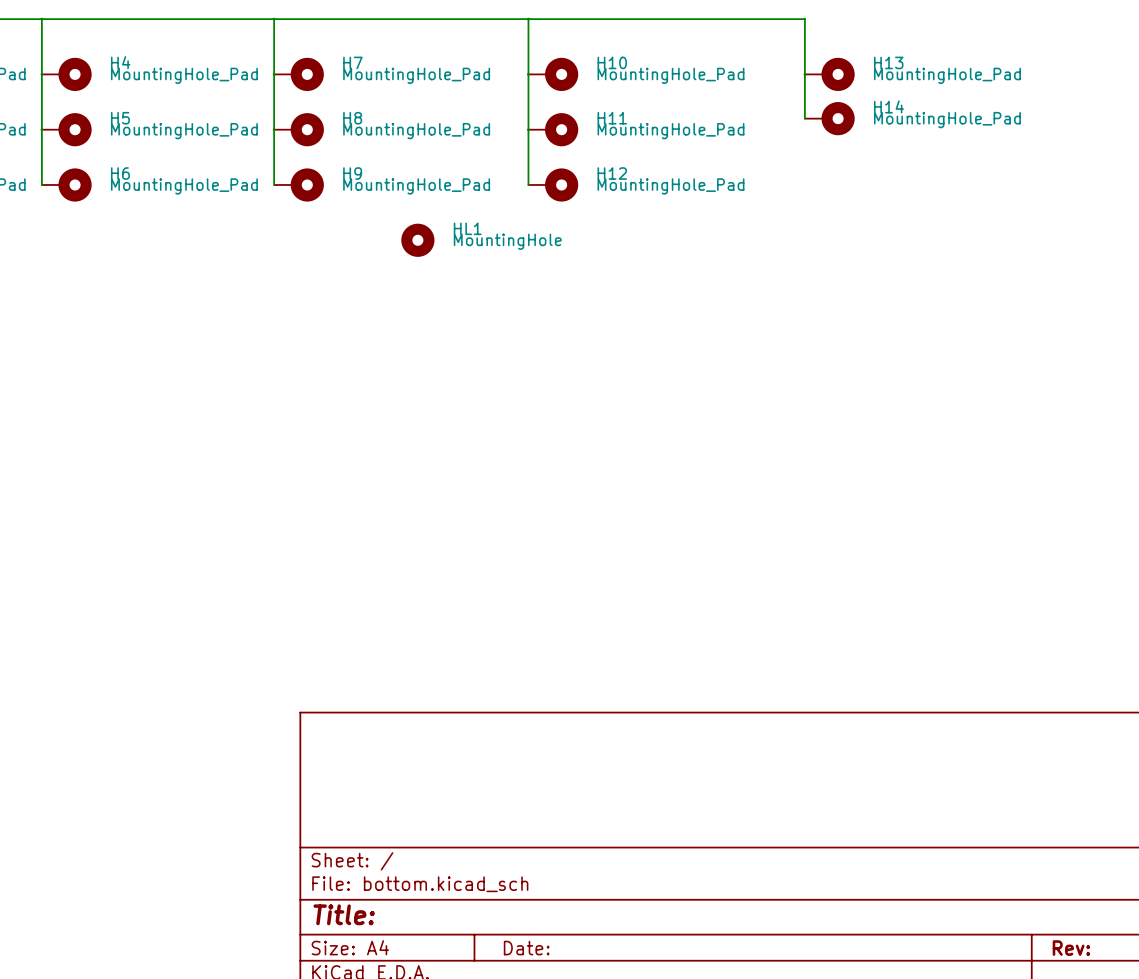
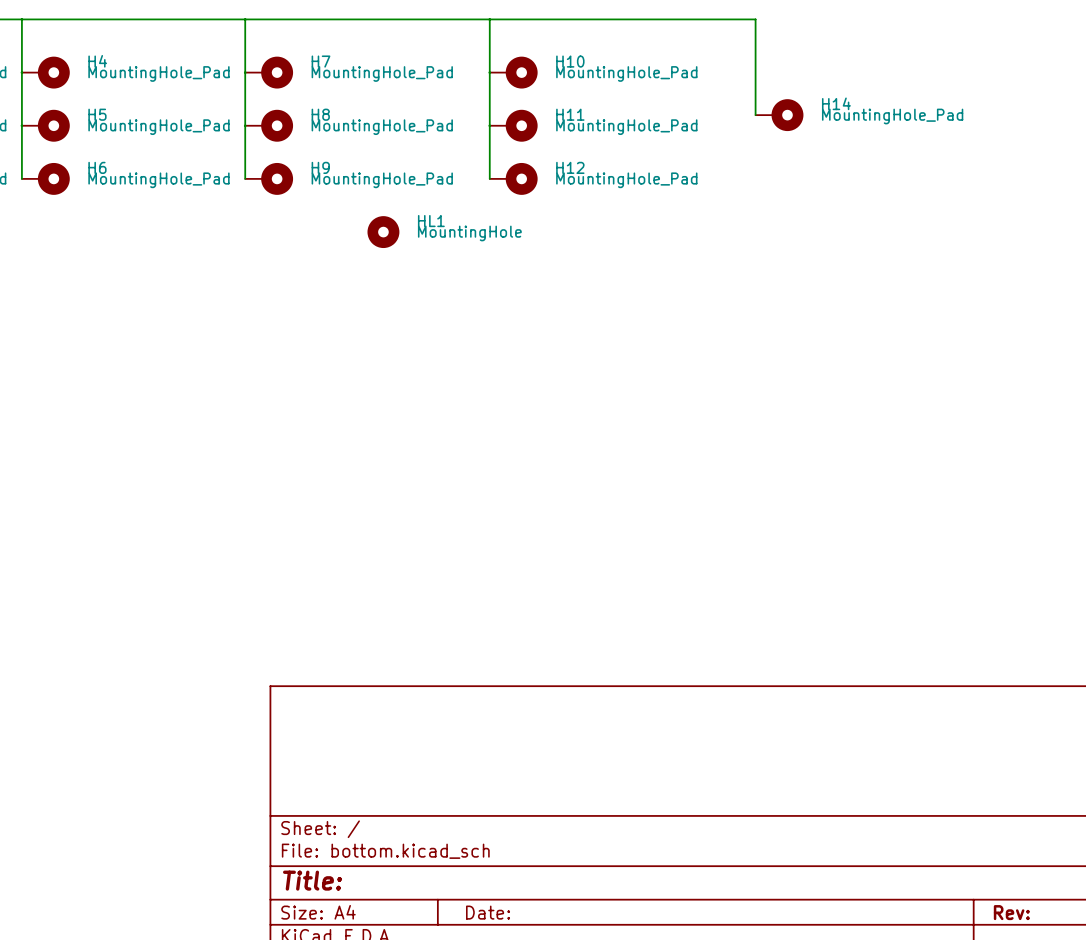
H13: MountingHole_Pad (829, 74) -> none

